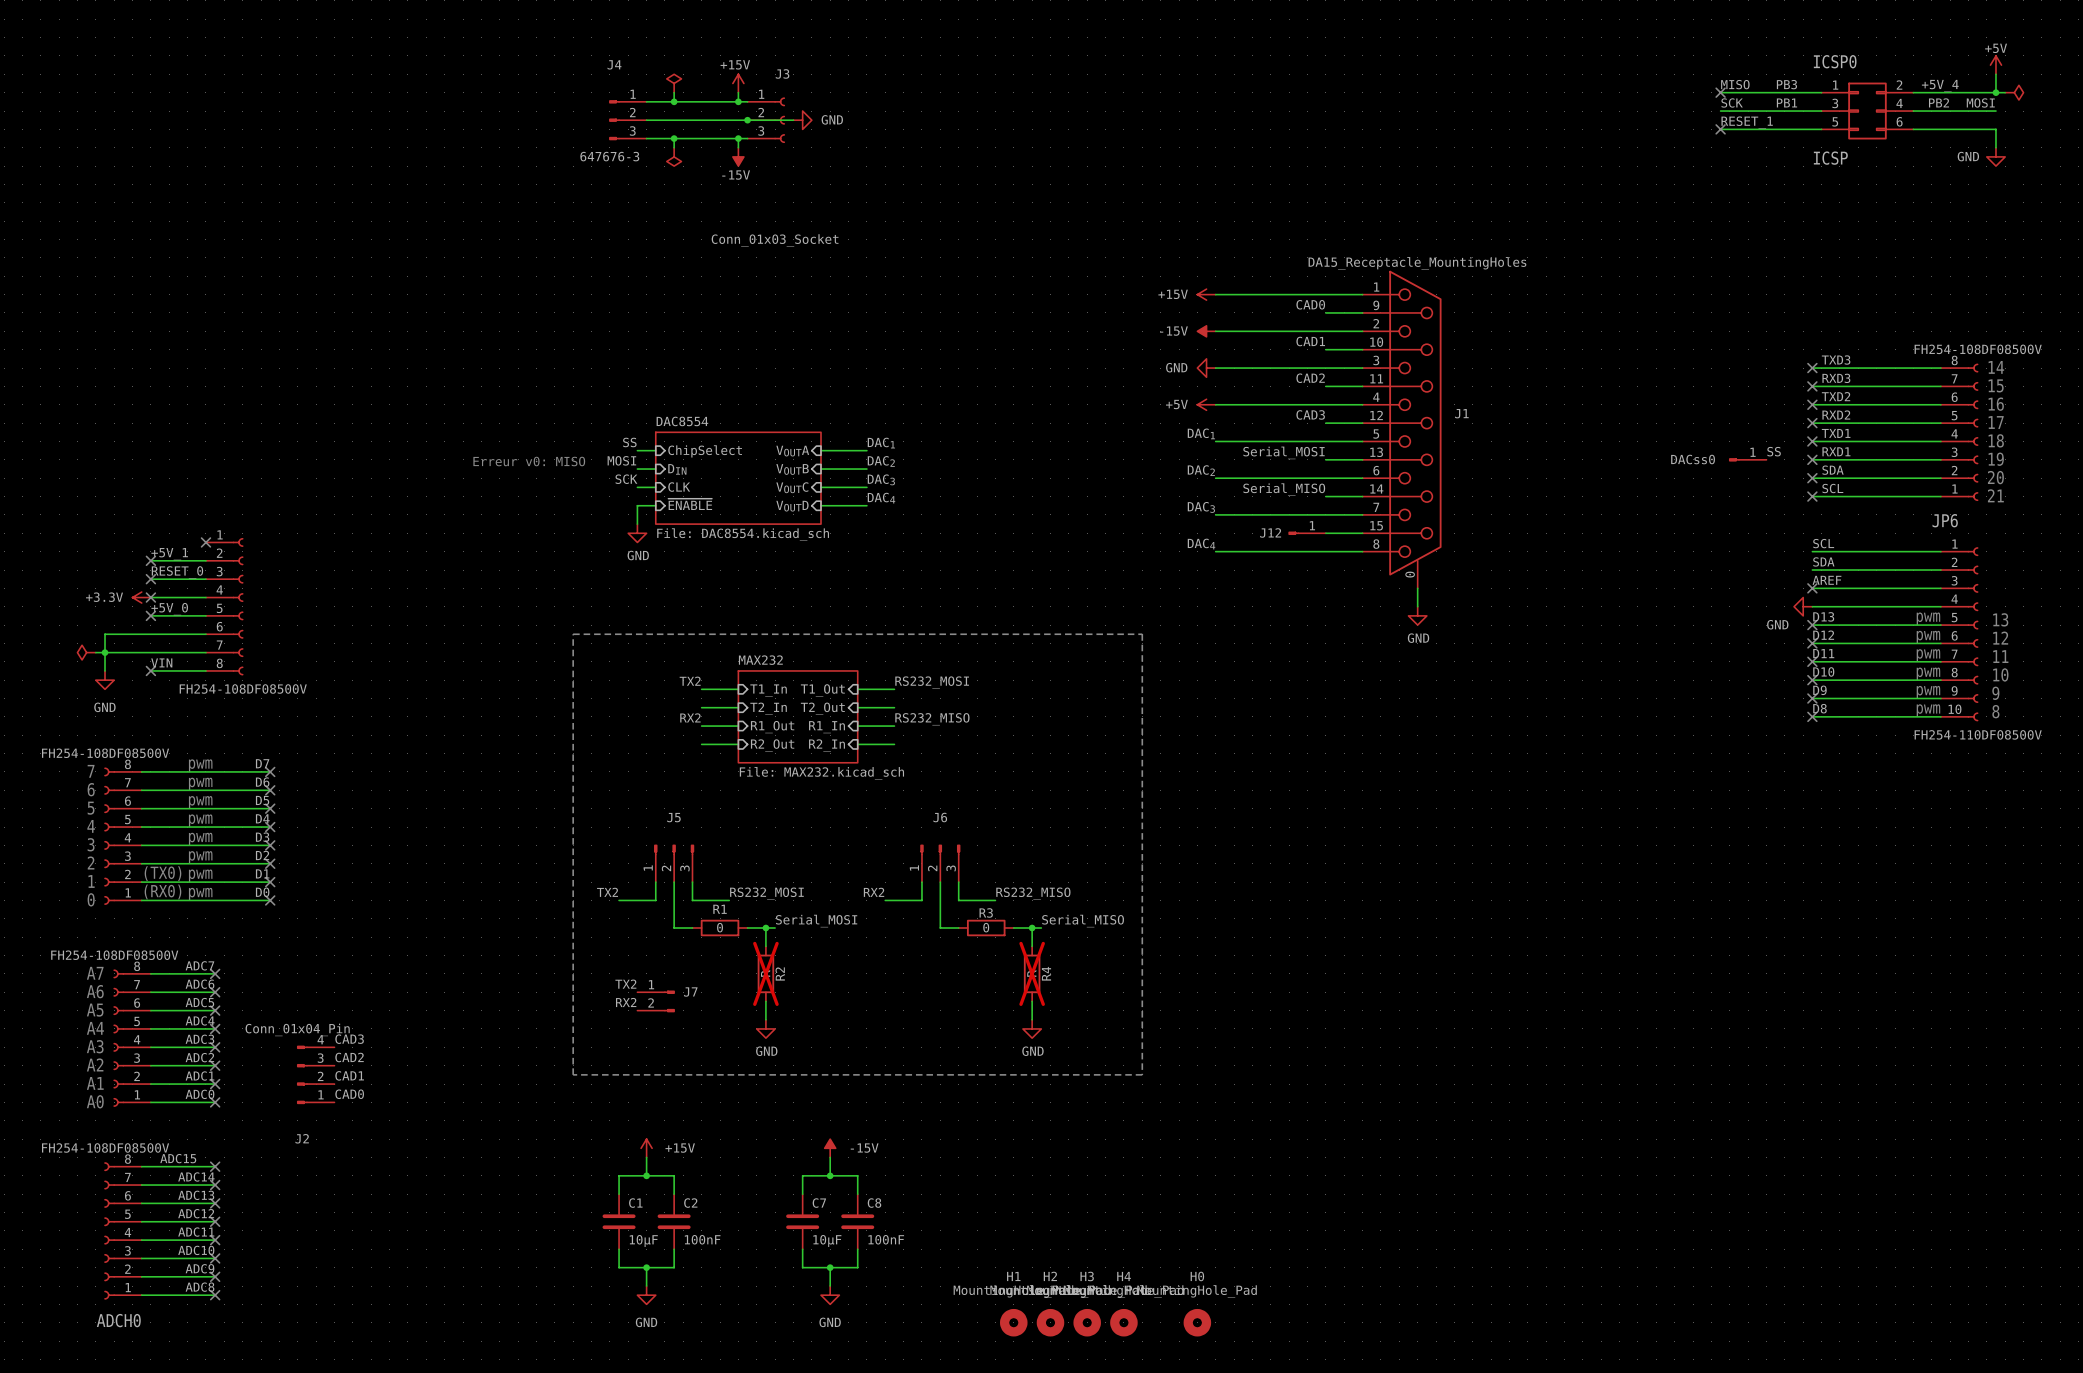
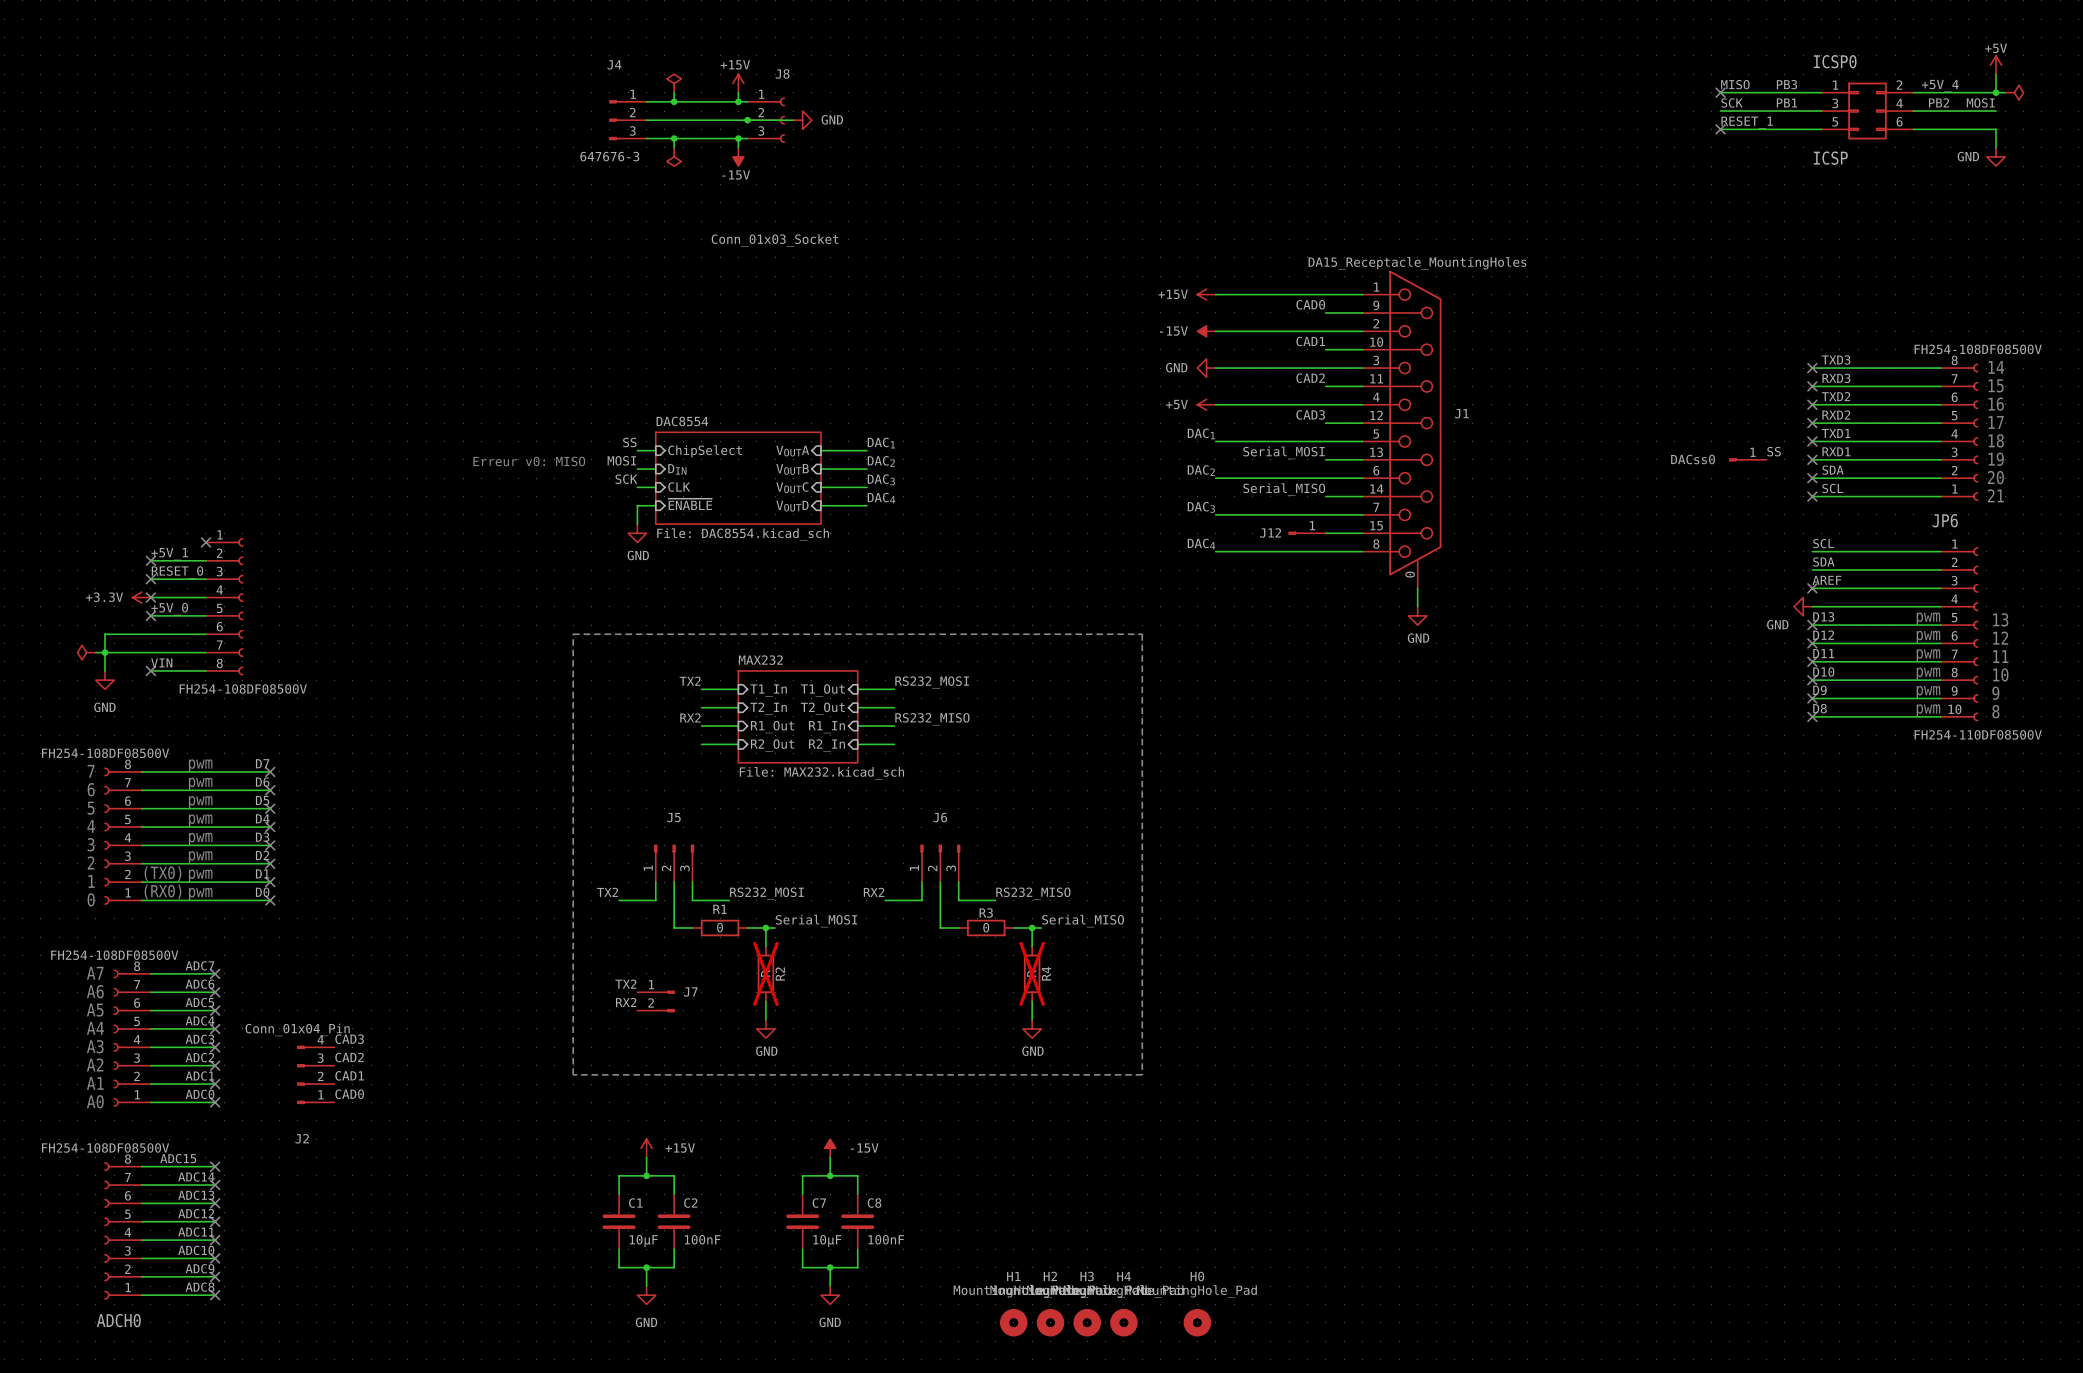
J3 name: J3 (782, 73) -> J8 (782, 73)

